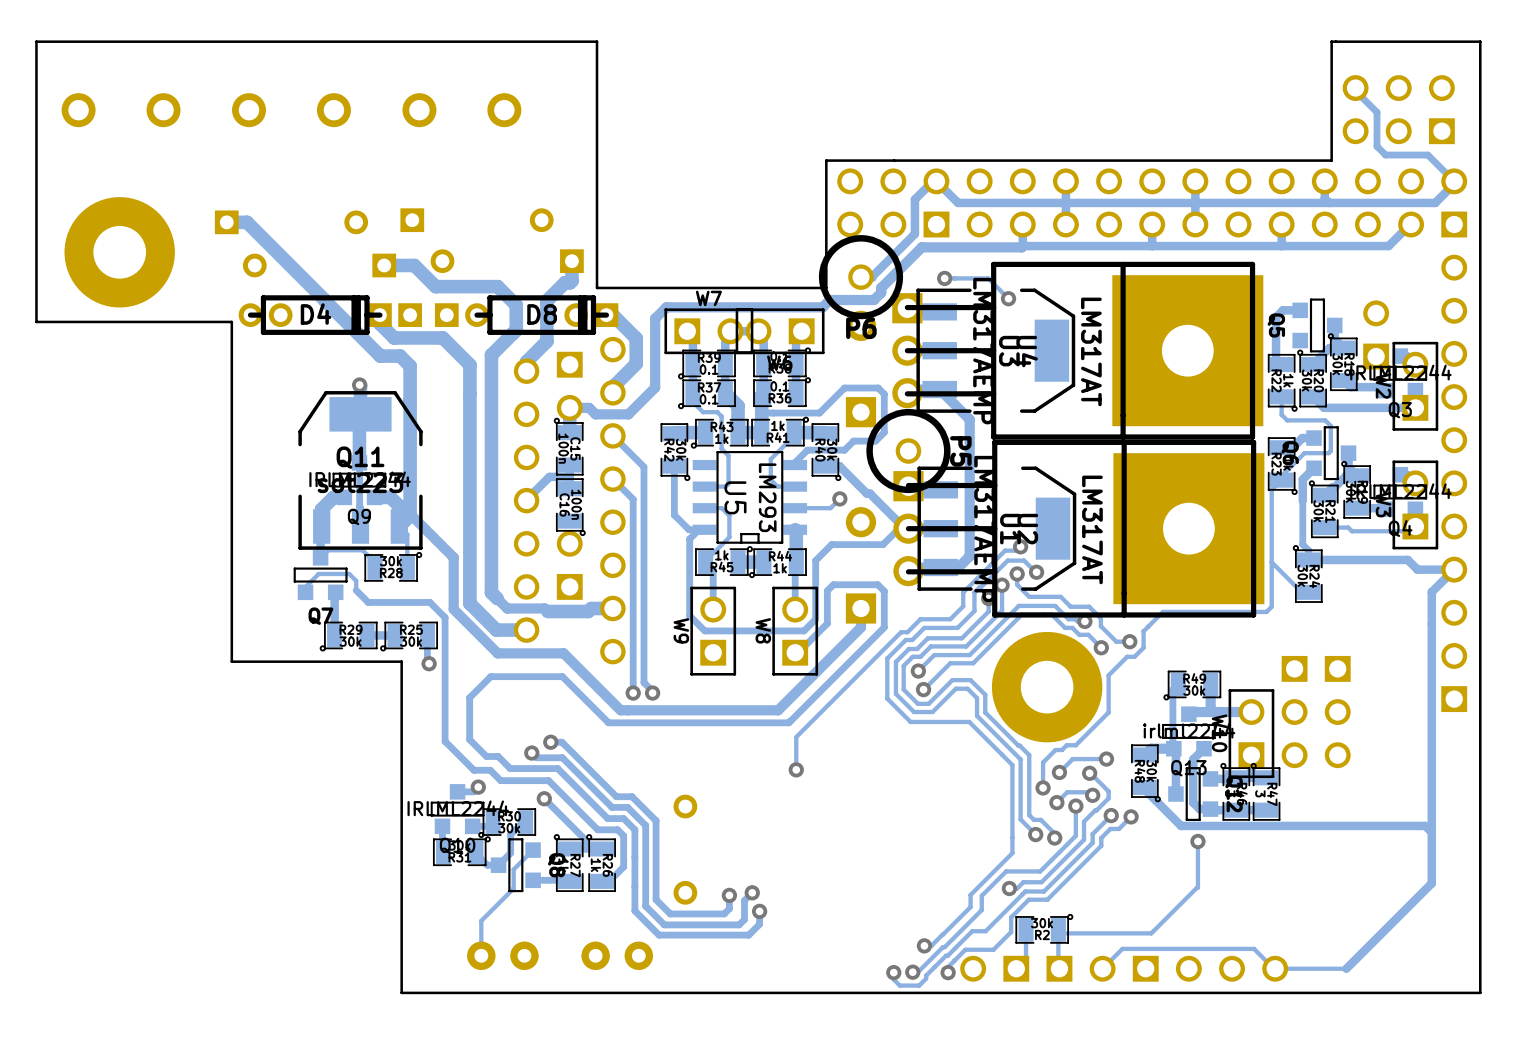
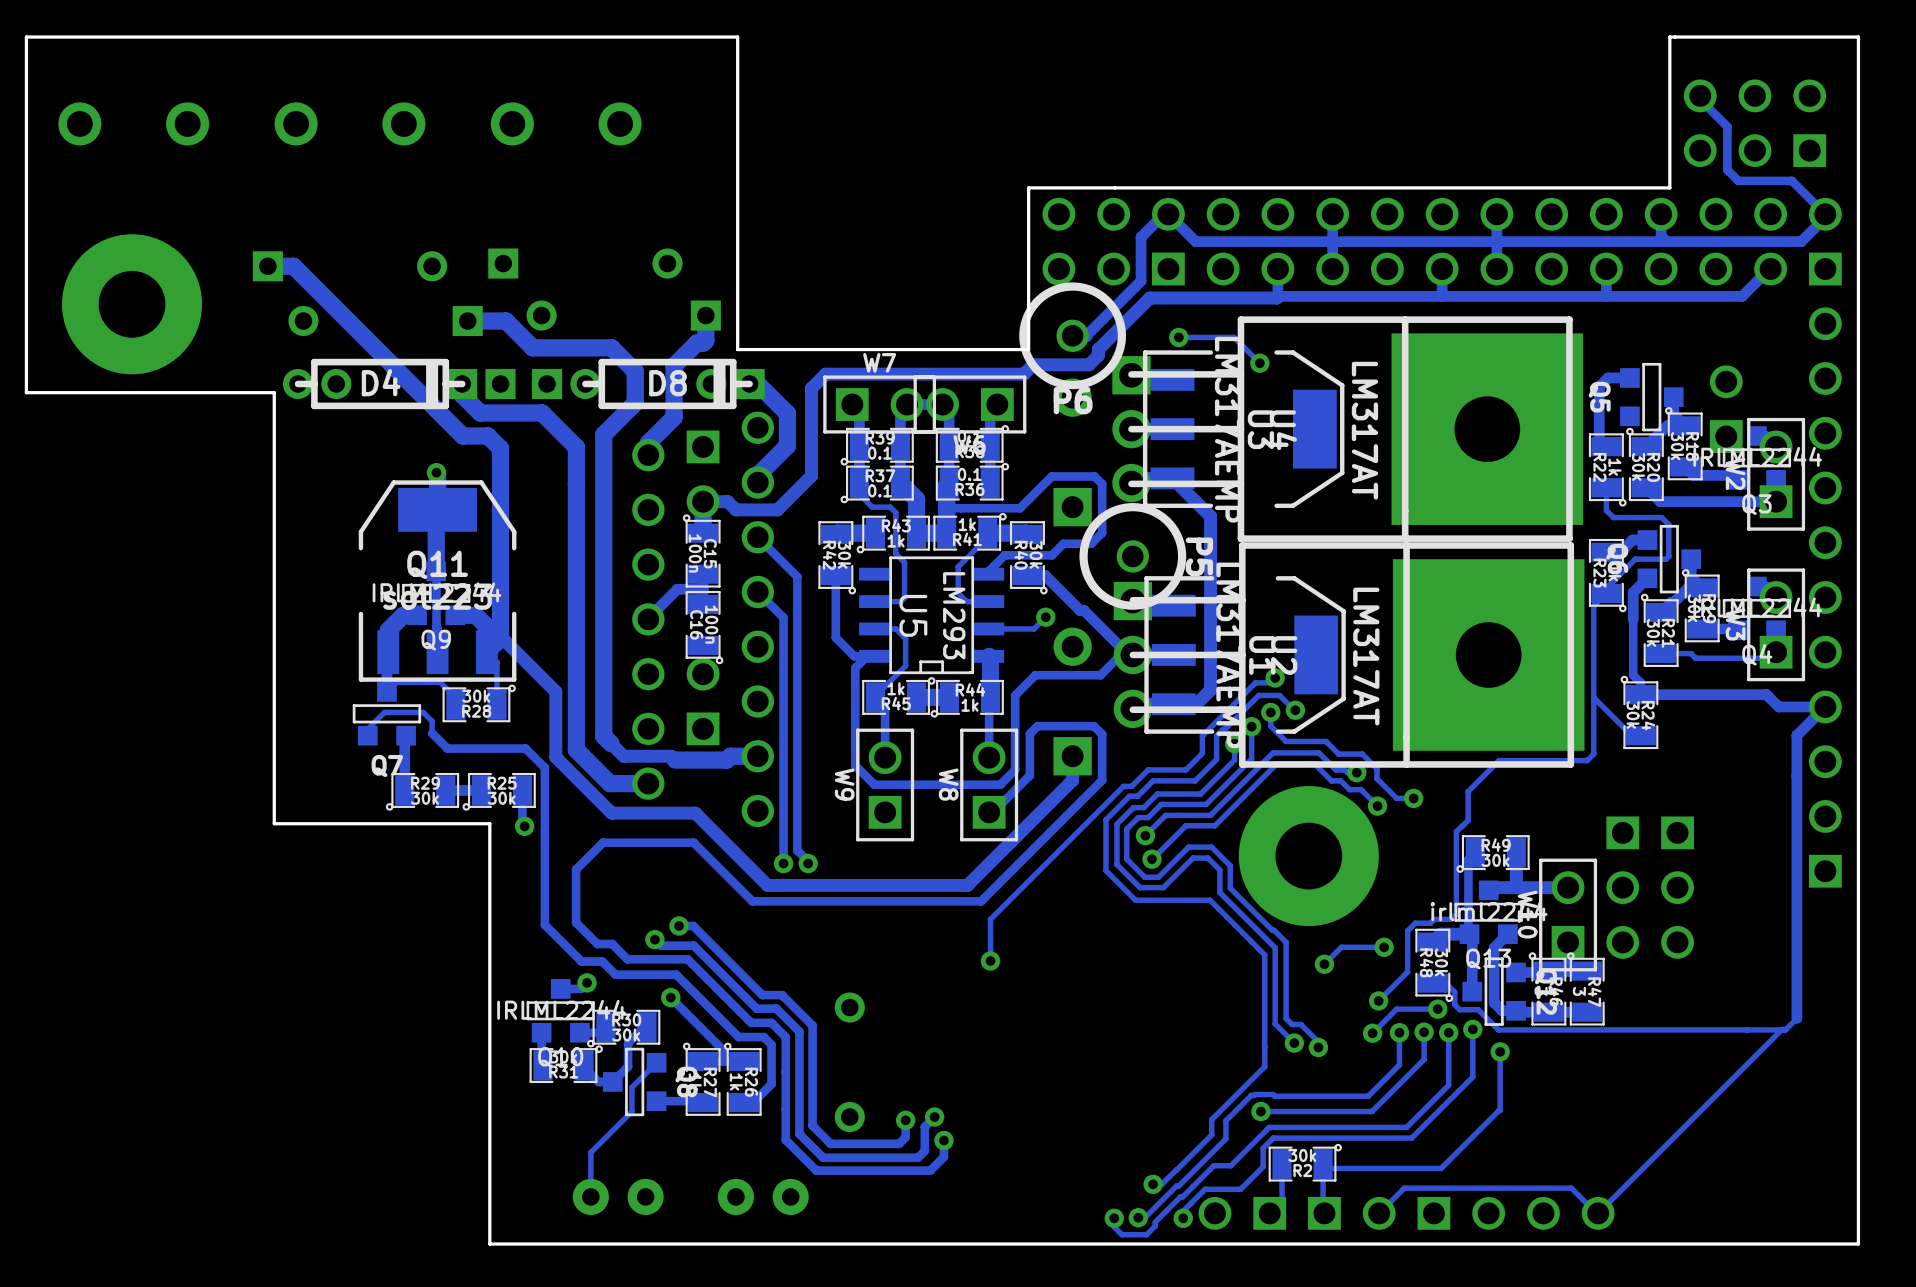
track: (1197, 611) (1163, 611) (1143, 631) (1143, 647) (1134, 656) (1127, 656) (1108, 675) (1108, 712) (1075, 745) (1066, 745) (1062, 750) (1055, 750) (1043, 762) (1043, 787) -> (1499, 760) (1468, 791) (1468, 820) (1456, 831) (1456, 914) (1451, 919) (1434, 919) (1430, 923) (1415, 923) (1407, 930) (1407, 971) (1378, 1000)
track: (1089, 773) (1108, 791) (1108, 798) (1084, 821) (1084, 839) (1041, 882) (1023, 882) (1017, 888) -> (1424, 1032) (1424, 1059) (1372, 1111) (1270, 1111)
via: (1089, 773) -> none
via: (1043, 787) -> none
track: (1144, 787) (1144, 789) (1181, 825) (1425, 825) (1431, 832) -> (1432, 983) (1445, 983) (1454, 992) (1454, 1004) (1459, 1009) (1478, 1009) (1498, 1029) (1785, 1029) (1796, 1018)
track: (1092, 795) (1089, 792) (1067, 792) (1056, 802) -> none
via: (1092, 795) -> none
via: none -> (1378, 1000)
via: (1056, 802) -> none
track: (1075, 806) (1075, 835) (1040, 871) (1006, 871) (1001, 875) -> (1399, 1032) (1399, 1065) (1368, 1096) (1251, 1095)
via: (1075, 806) -> none
track: none -> (1437, 1009) (1396, 1009) (1372, 1033)
via: none -> (1437, 1009)
track: (1111, 815) (1092, 834) (1092, 842) (1043, 891) (1025, 891) (1015, 901) -> (1448, 1032) (1448, 1085) (1406, 1127) (1269, 1127)
via: (1111, 815) -> none
track: (1431, 815) (1431, 883) (1346, 968) (1275, 968) -> (1785, 1029) (1782, 1029) (1598, 1213)
track: (1131, 816) (1118, 828) (1110, 828) (1101, 838) (1101, 845) (1047, 899) (1028, 899) (1019, 909) -> (1472, 1029) (1472, 1077) (1411, 1138) (1273, 1138)
via: (1131, 816) -> none
via: none -> (1472, 1029)
via: none -> (1424, 1032)
via: none -> (1372, 1033)
via: none -> (1399, 1032)
via: none -> (1448, 1032)

